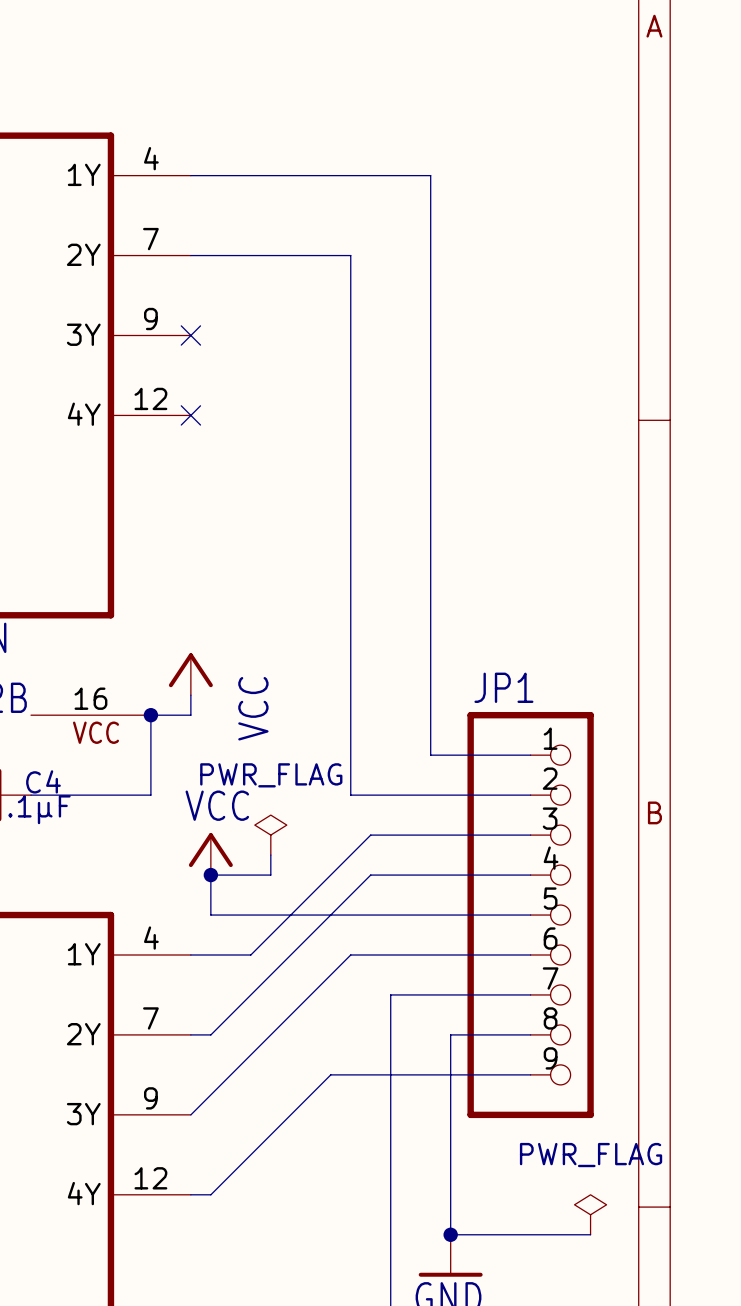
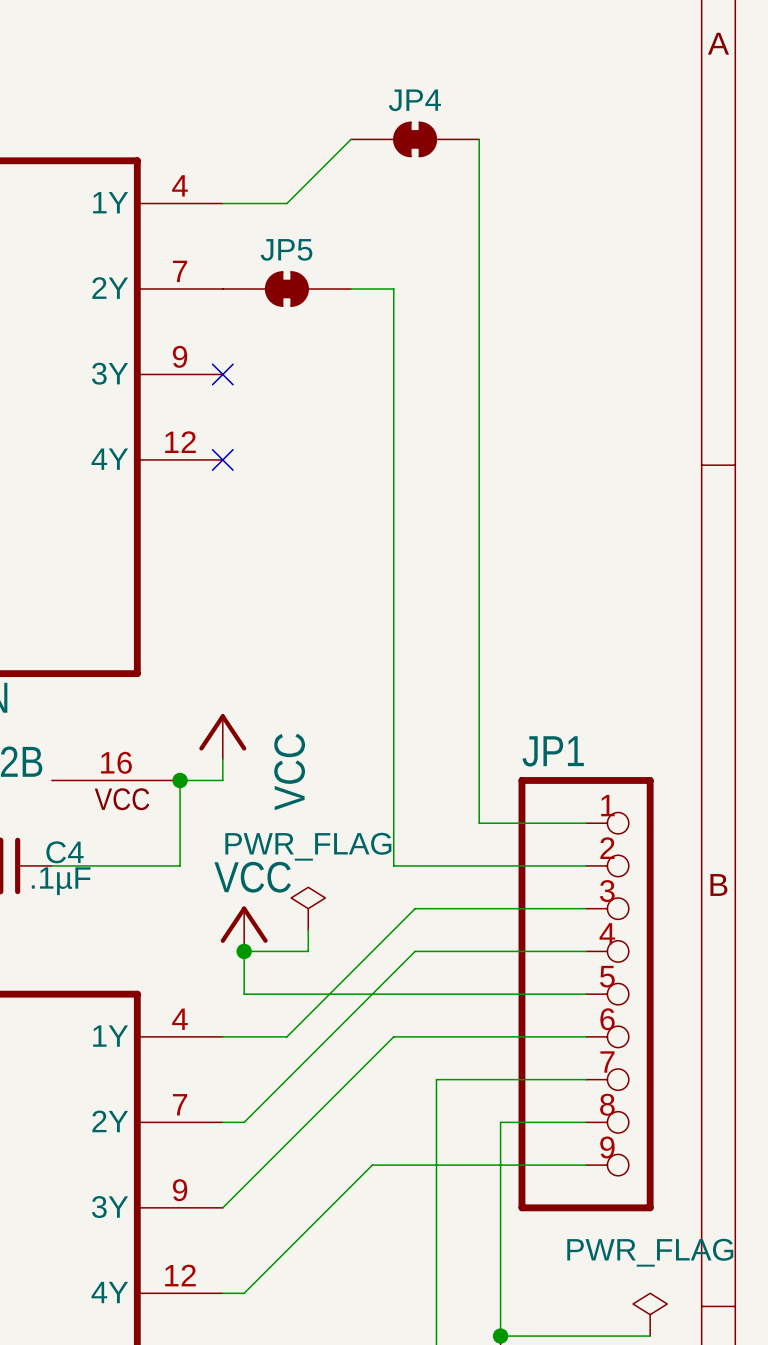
JP4: none -> (415, 139)
wire: none -> (479, 139) (479, 203)
wire: (250, 175) (430, 175) -> (286, 203) (351, 139)
JP5: none -> (286, 289)

